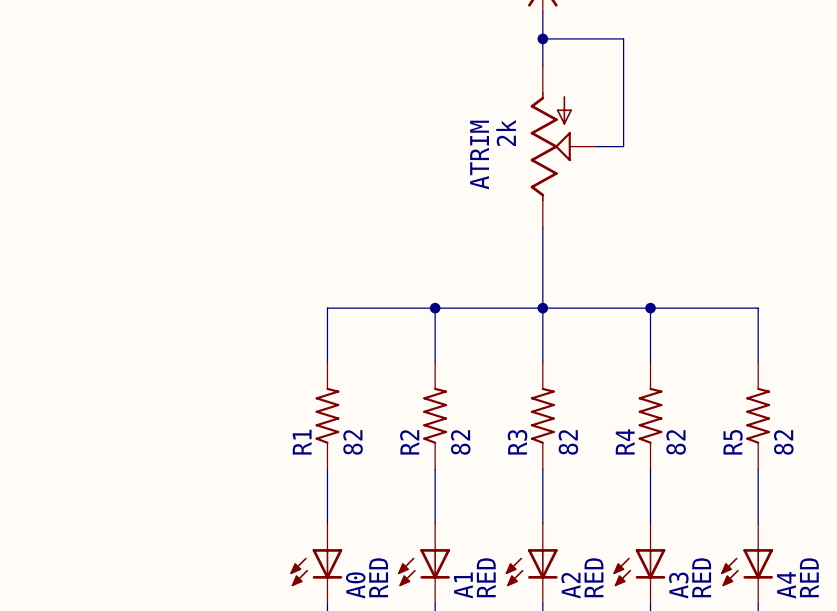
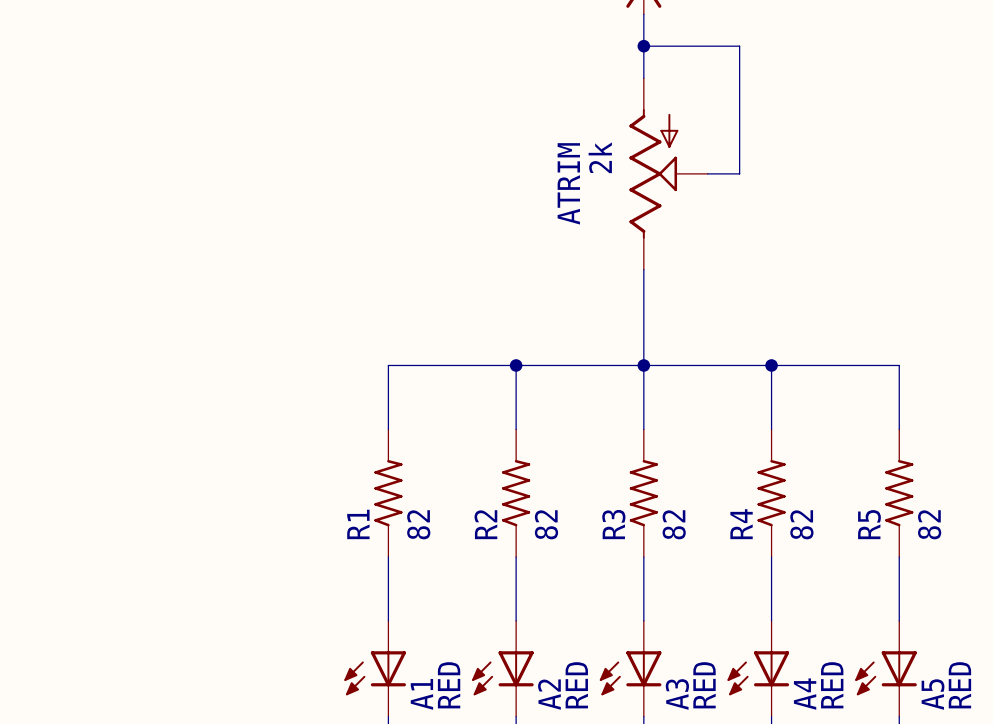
A0 name: A0 (355, 585) -> A1 (421, 694)
A1 name: A1 (463, 585) -> A2 (549, 694)
A2 name: A2 (570, 585) -> A3 (677, 694)
A3 name: A3 (678, 585) -> A4 (805, 694)
A4 name: A4 (786, 585) -> A5 (933, 694)

